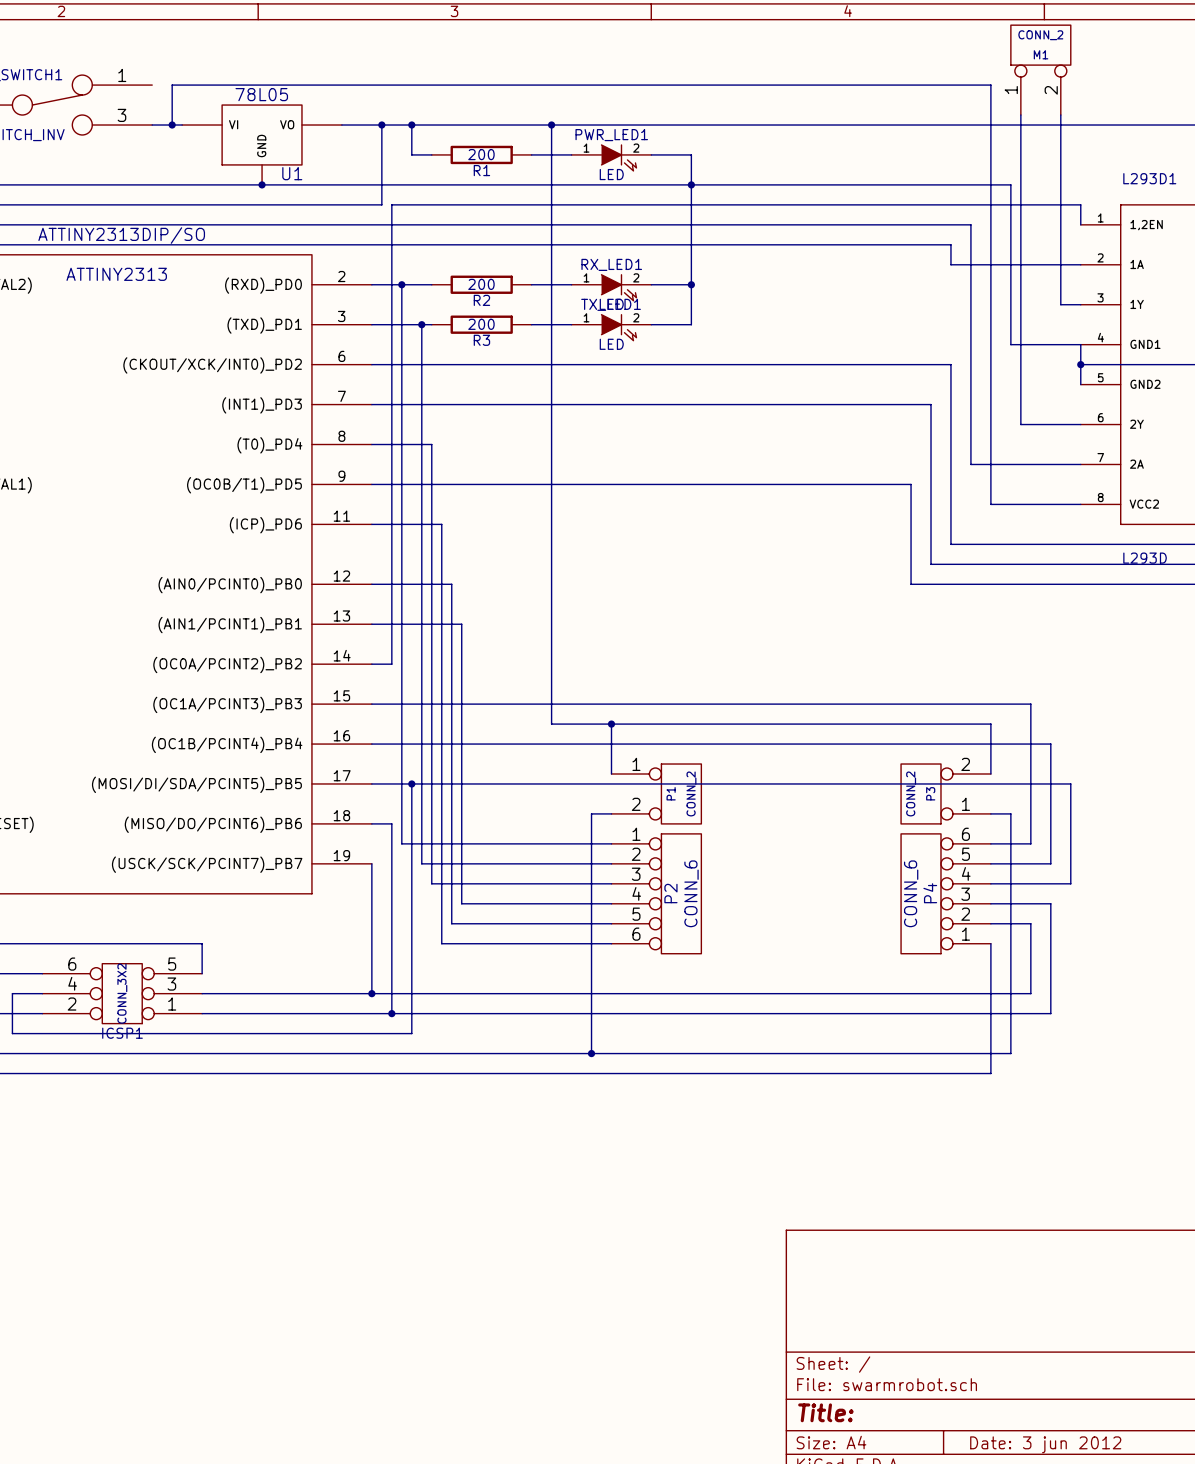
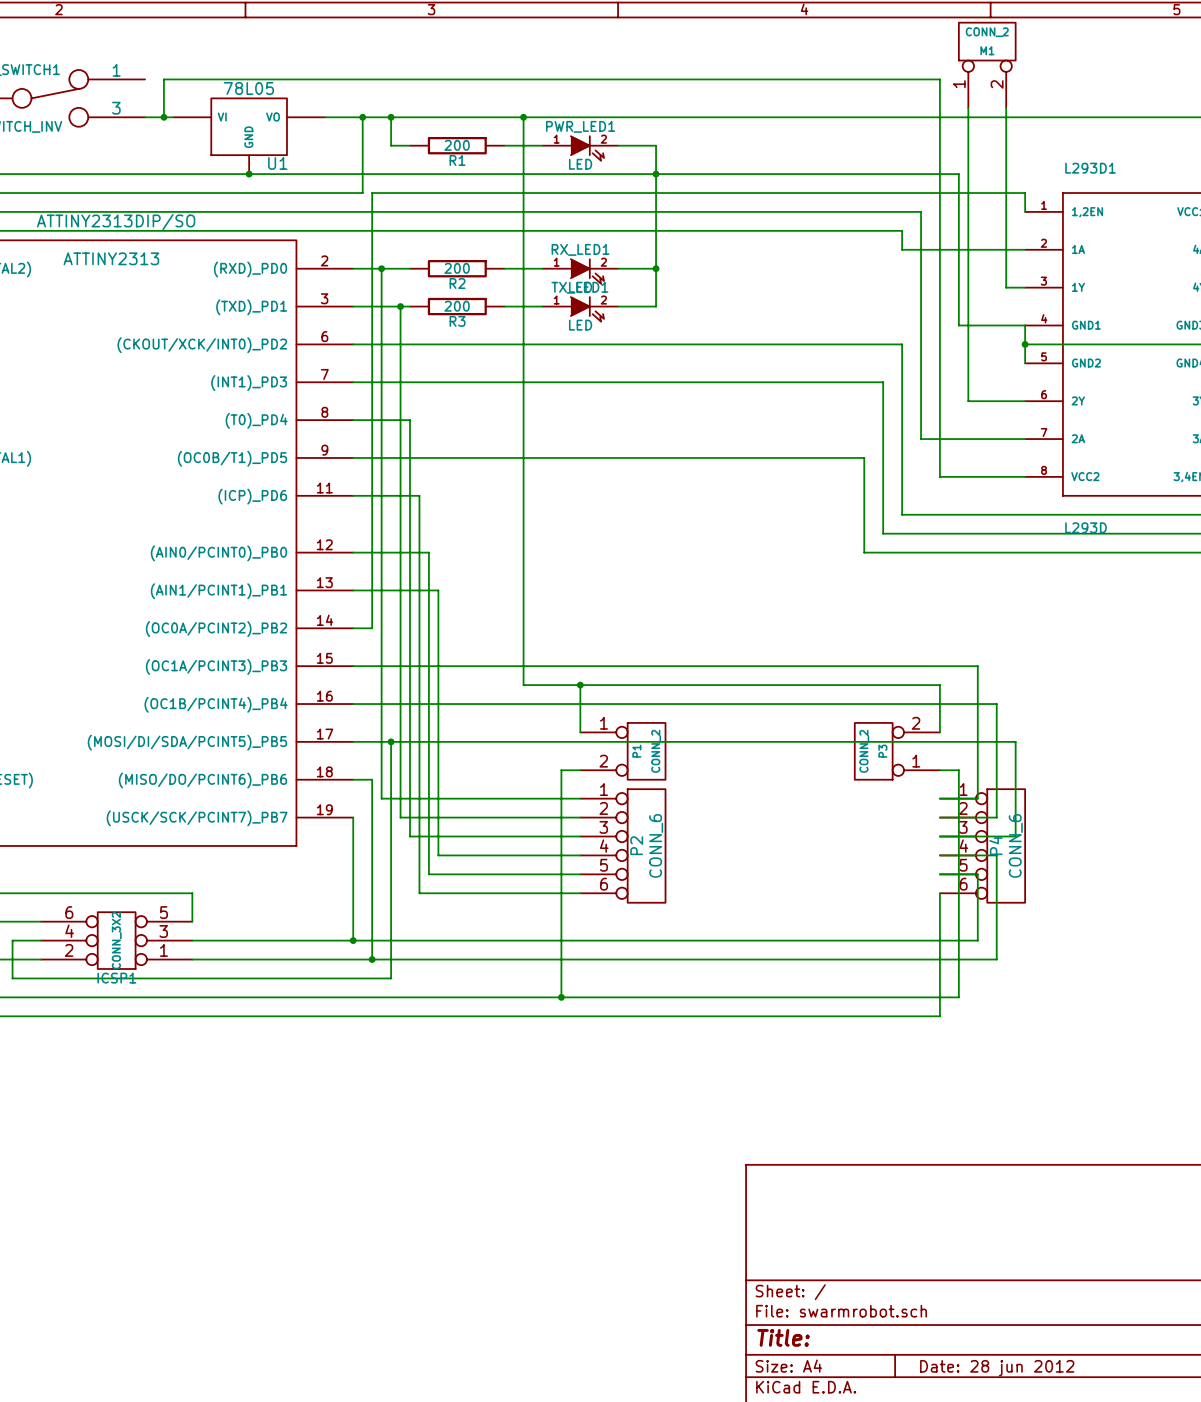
P4 rotation: 0° (921, 893) -> 180° (1006, 845)
P4 position: (945, 893) -> (982, 845)
title block: Date: 3 jun 2012 (1045, 1444) -> Date: 28 jun 2012 (997, 1368)

